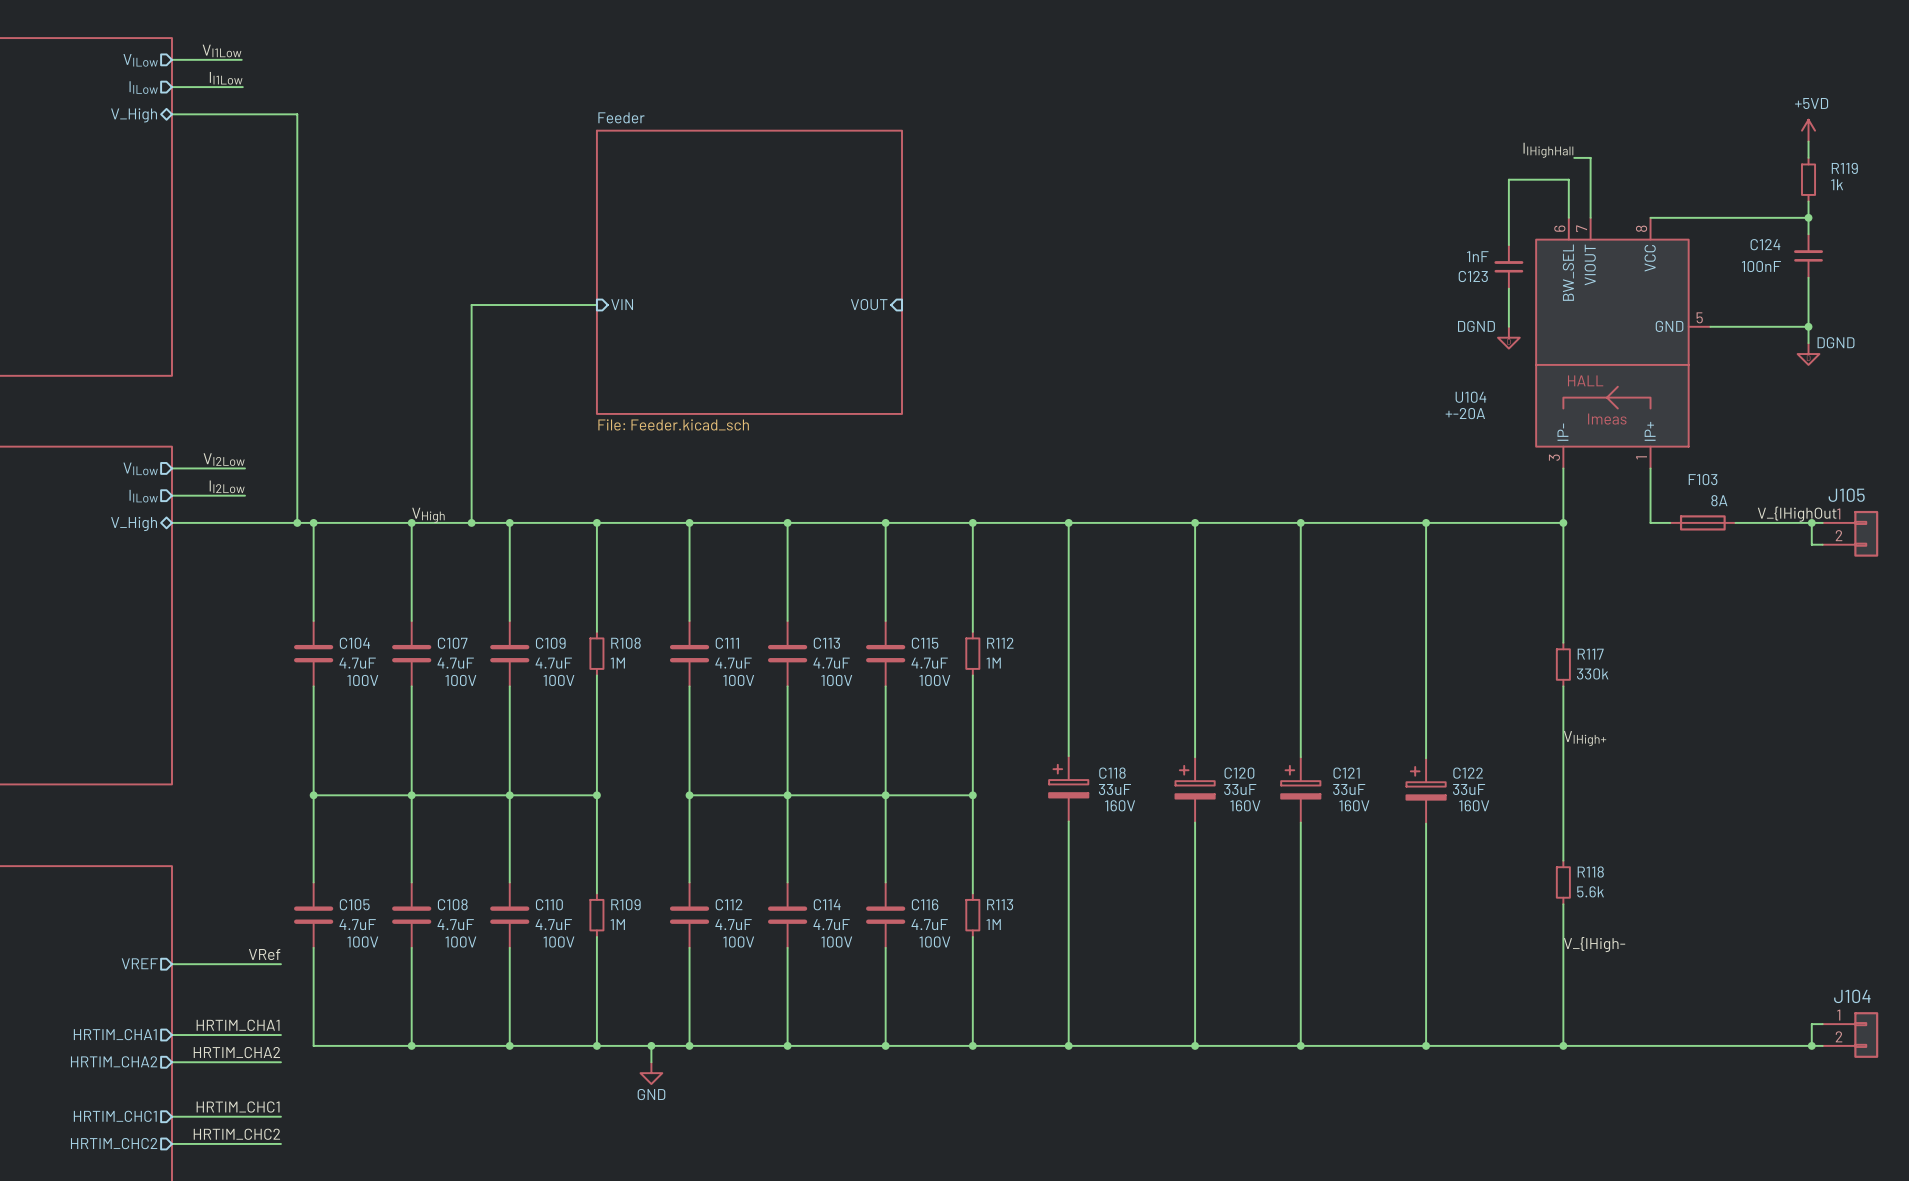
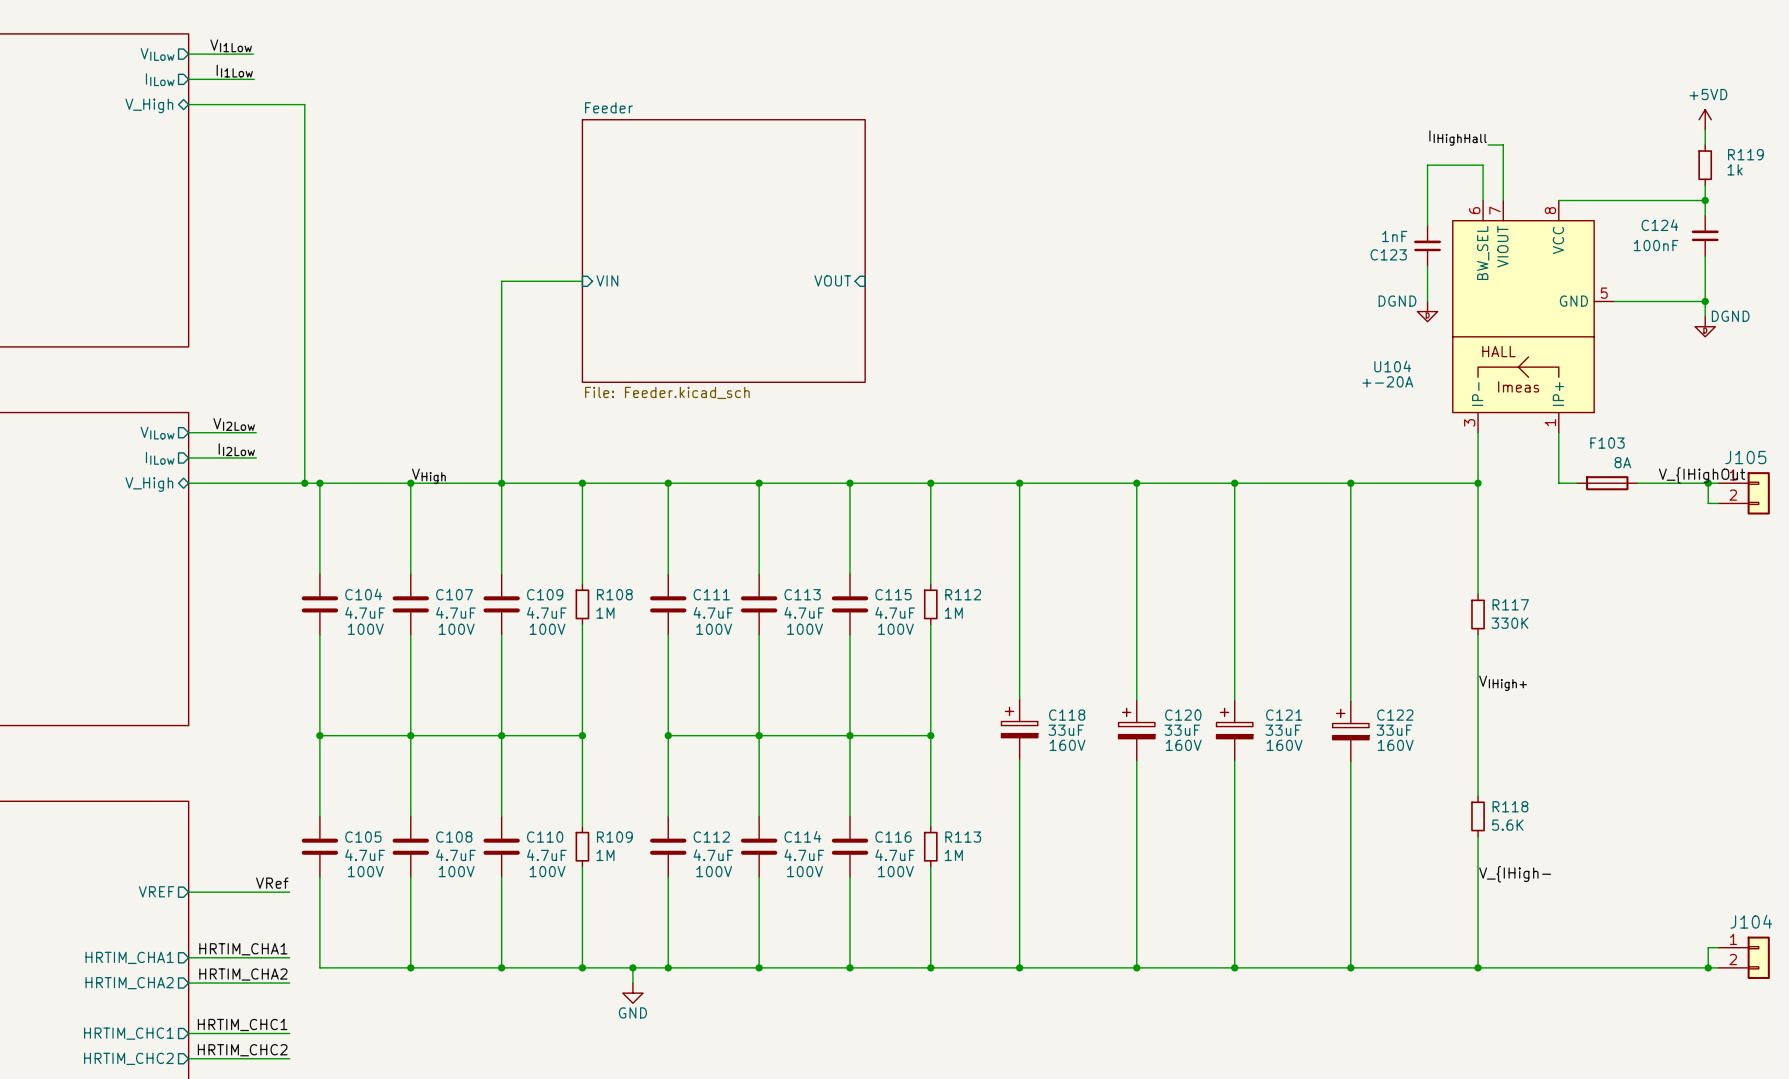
wire: (509, 305) (471, 305) (471, 522) -> (501, 281) (501, 483)
junction: (471, 522) -> none
R117 value: 330k (1592, 673) -> 330K (1509, 623)
R118 value: 5.6k (1590, 891) -> 5.6K (1507, 825)

